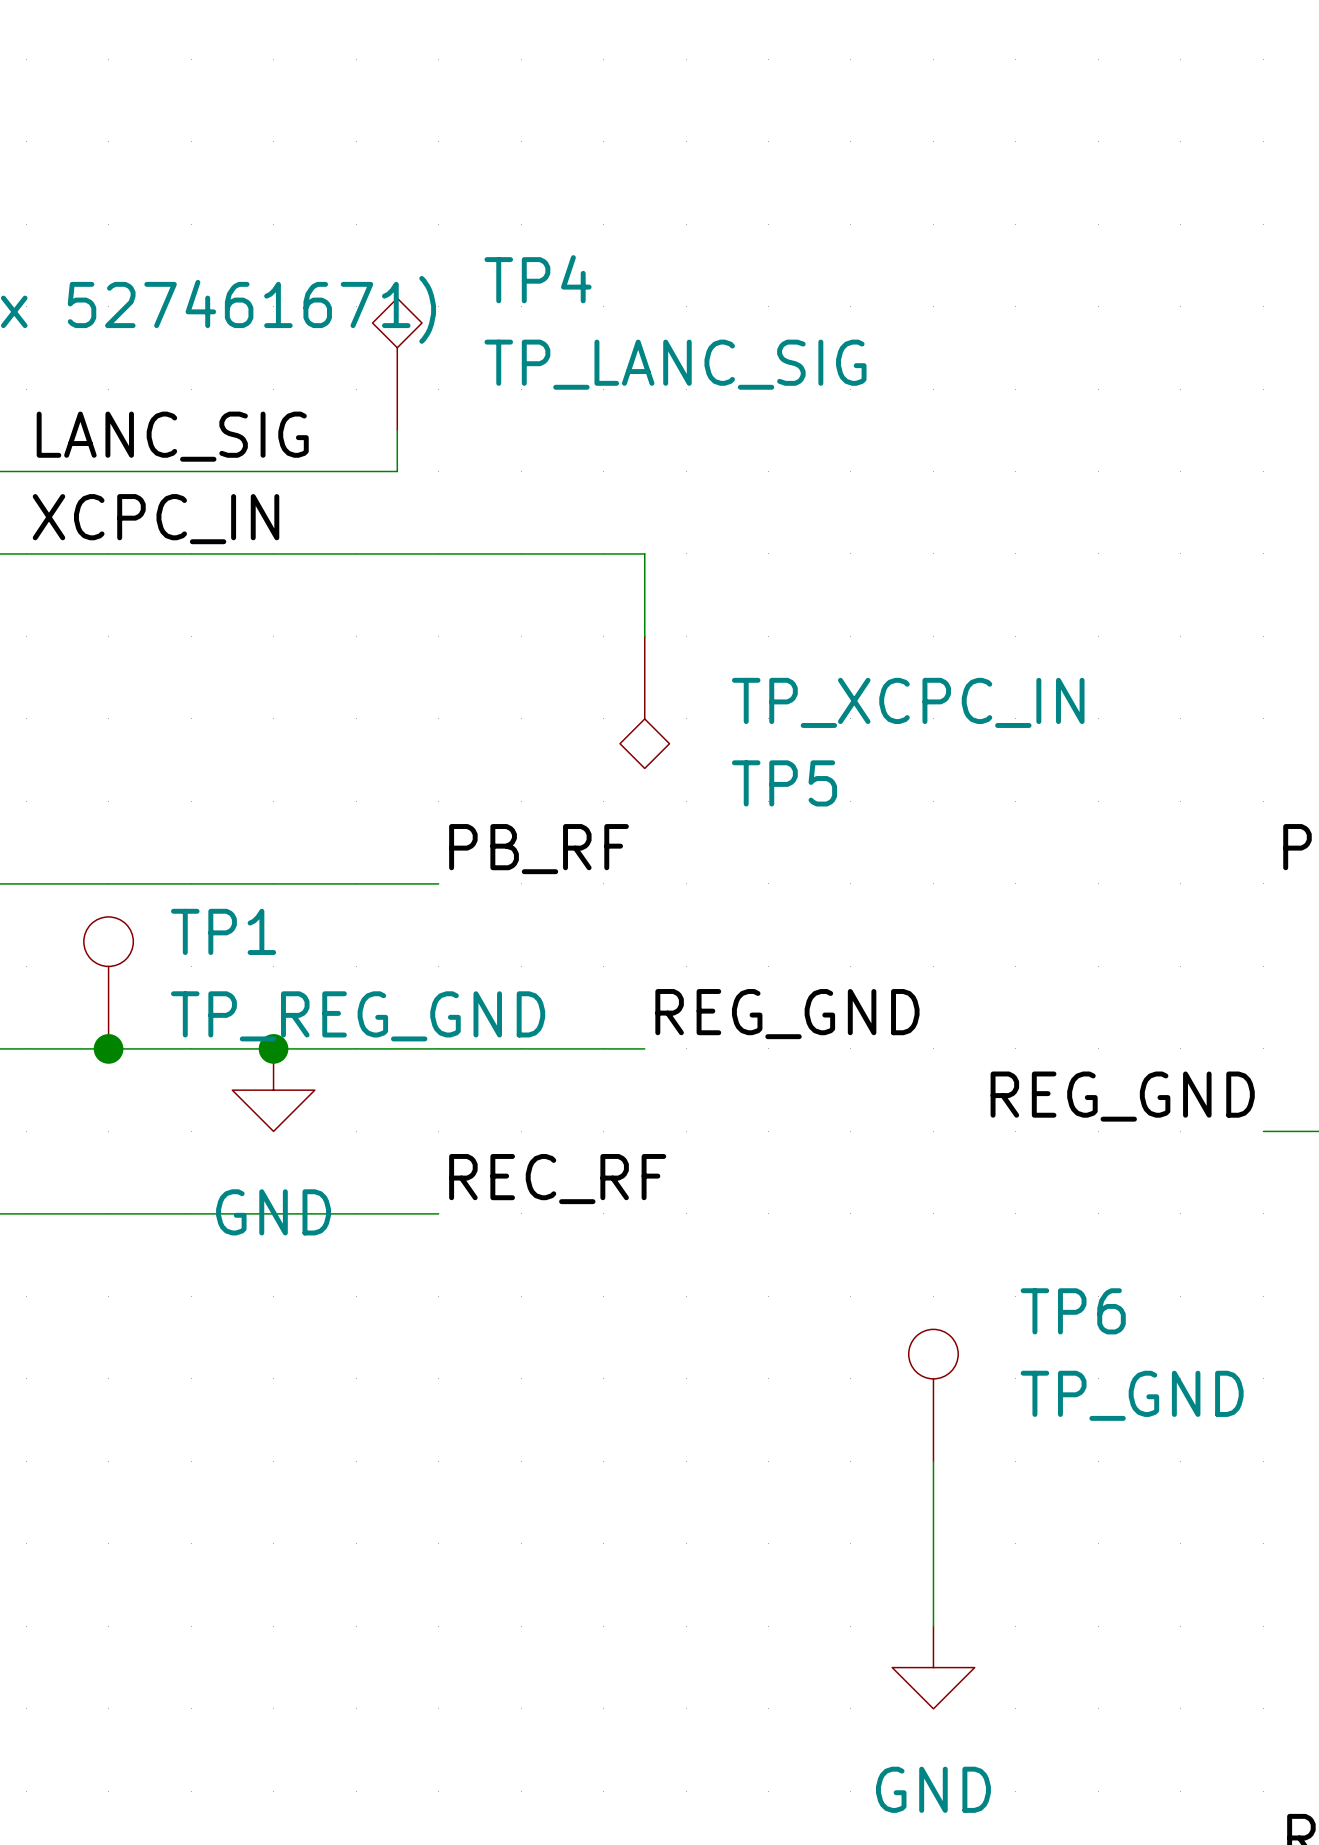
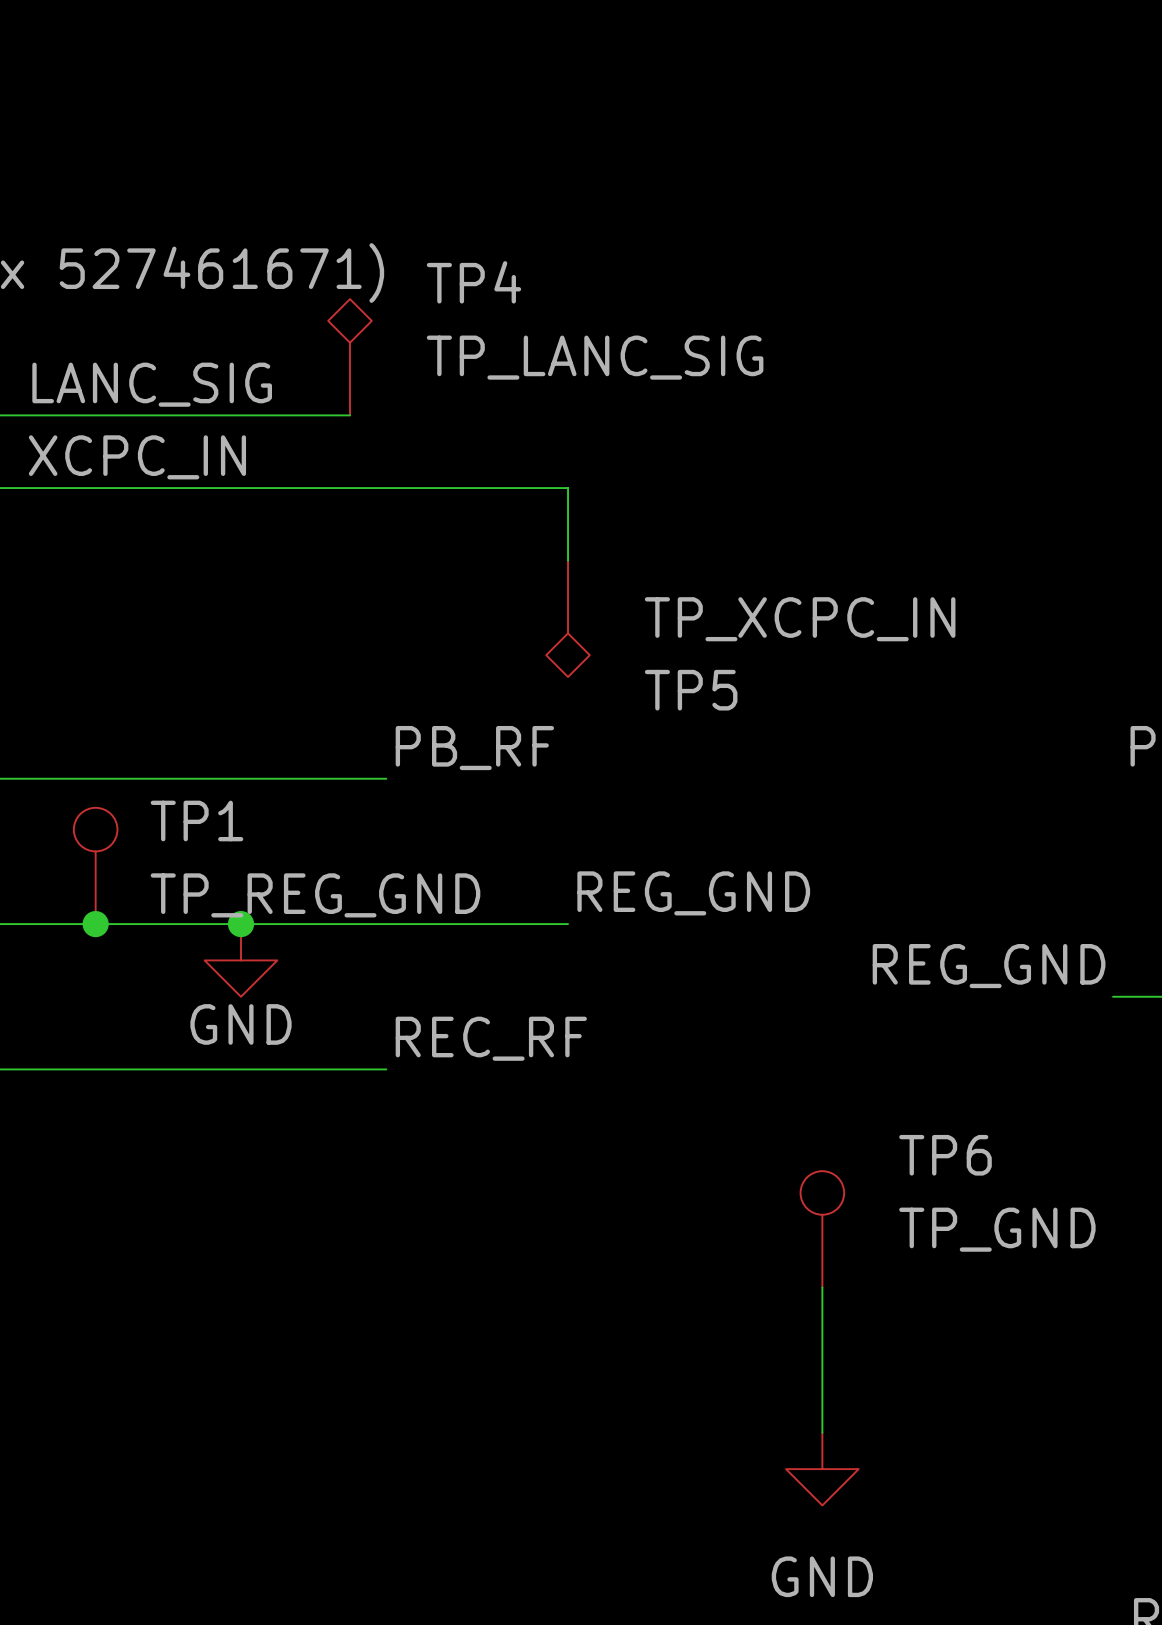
TP4 position: (397, 364) -> (350, 357)
power symbol text position: GND (273, 1212) -> GND (240, 1024)

